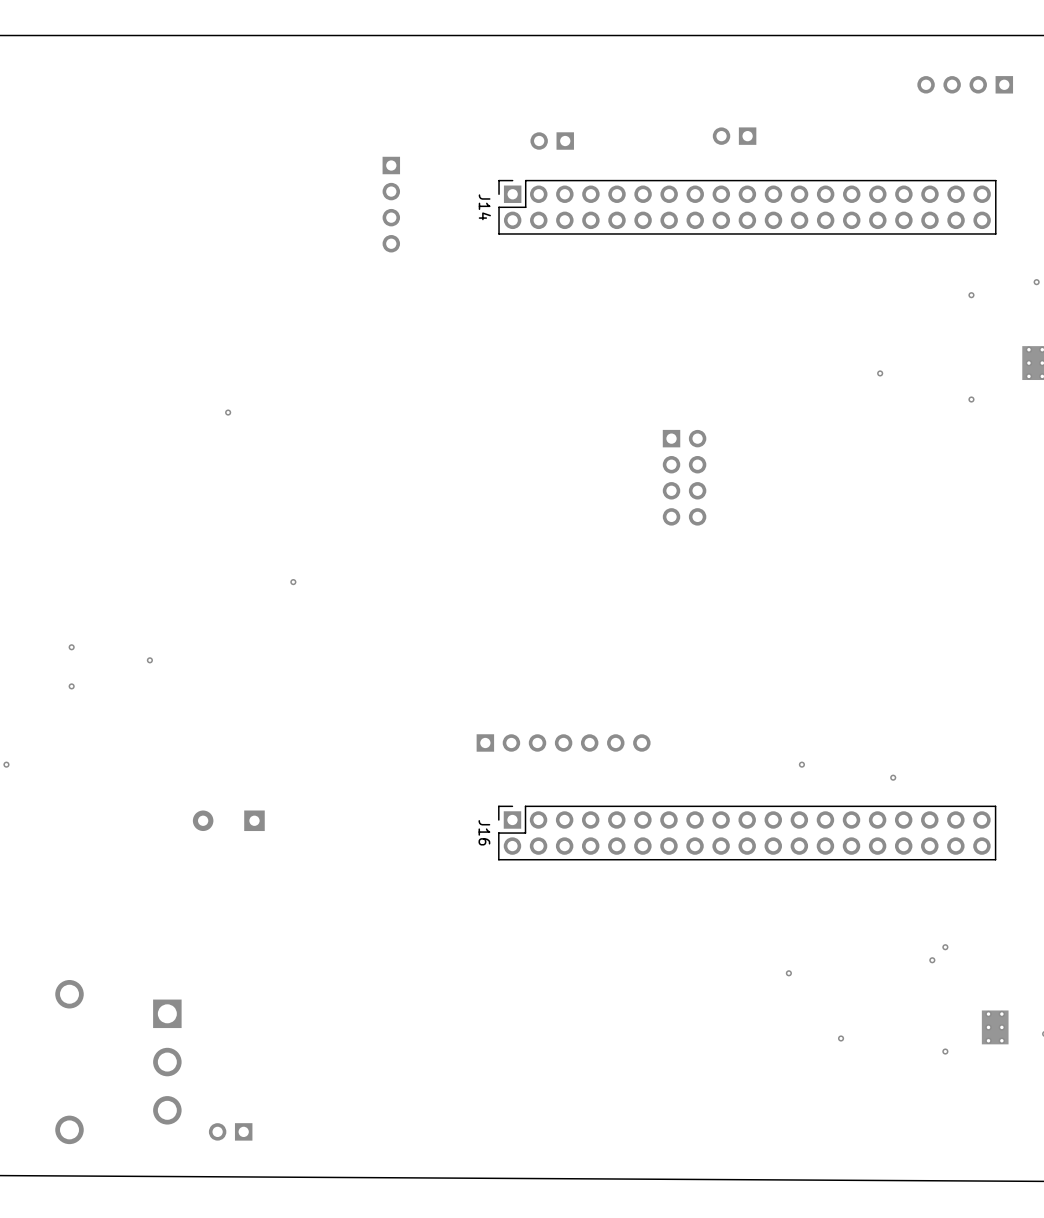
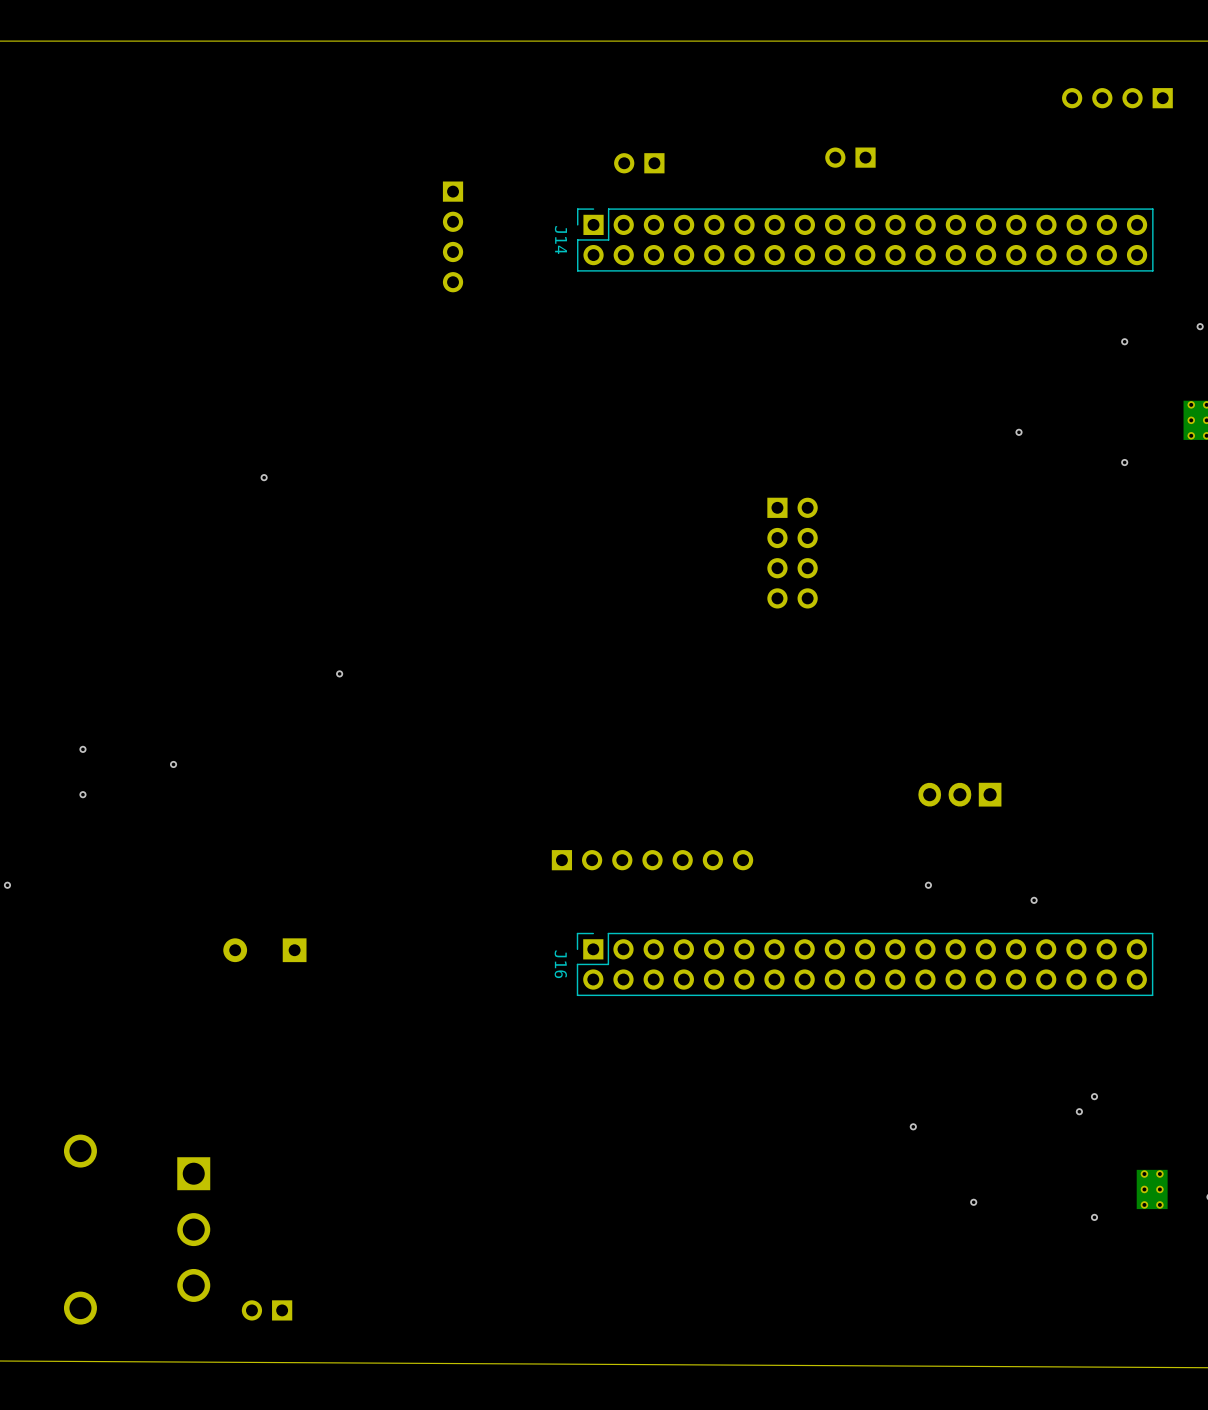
part: none -> (959, 794)

